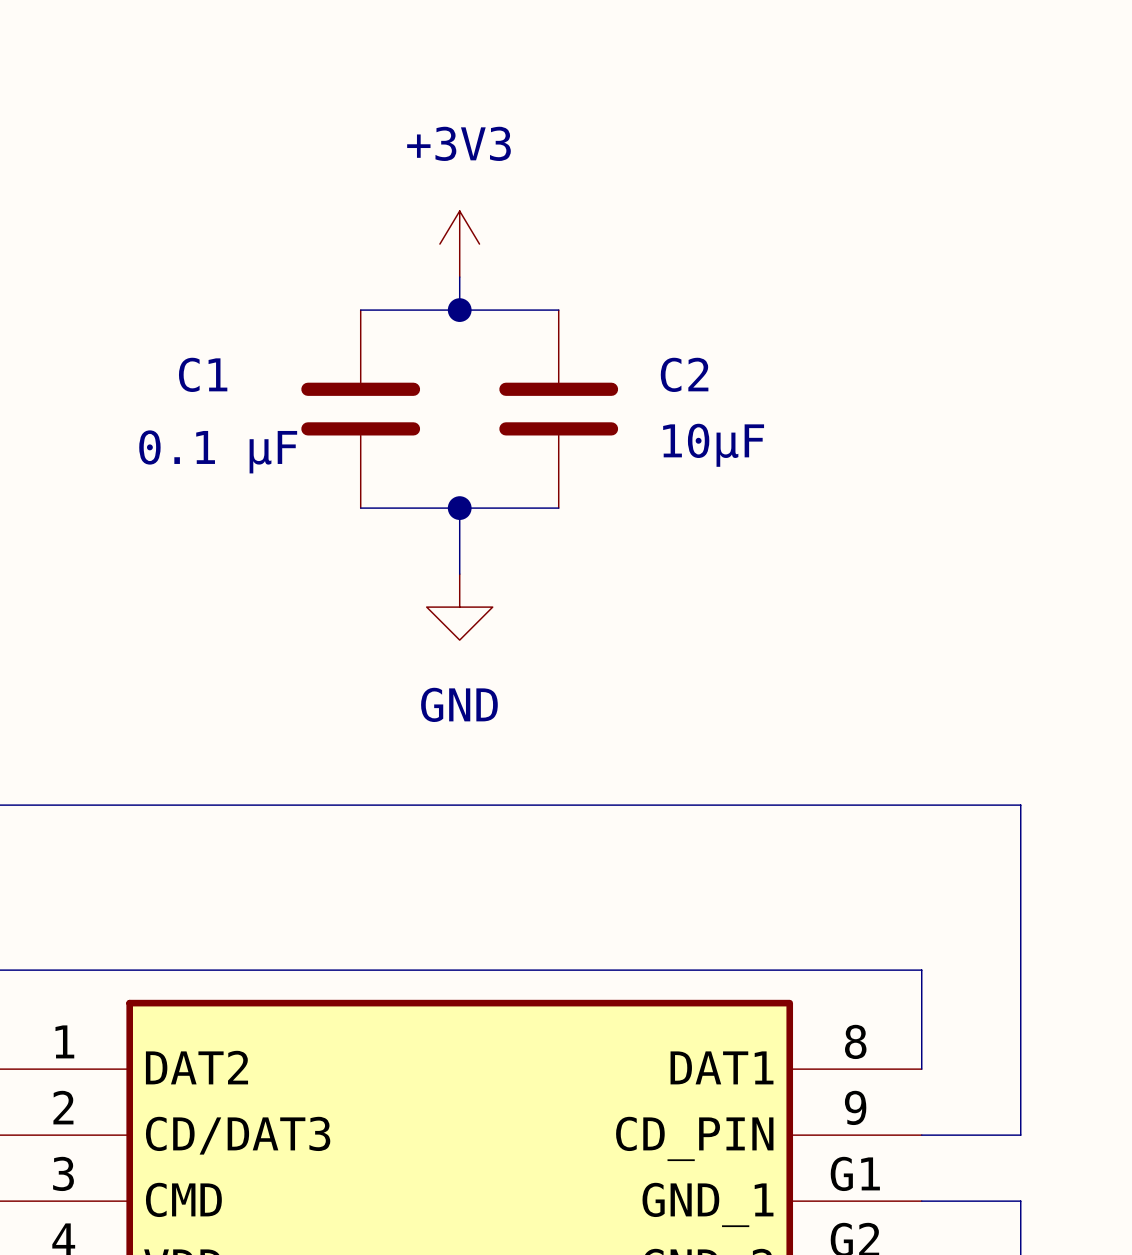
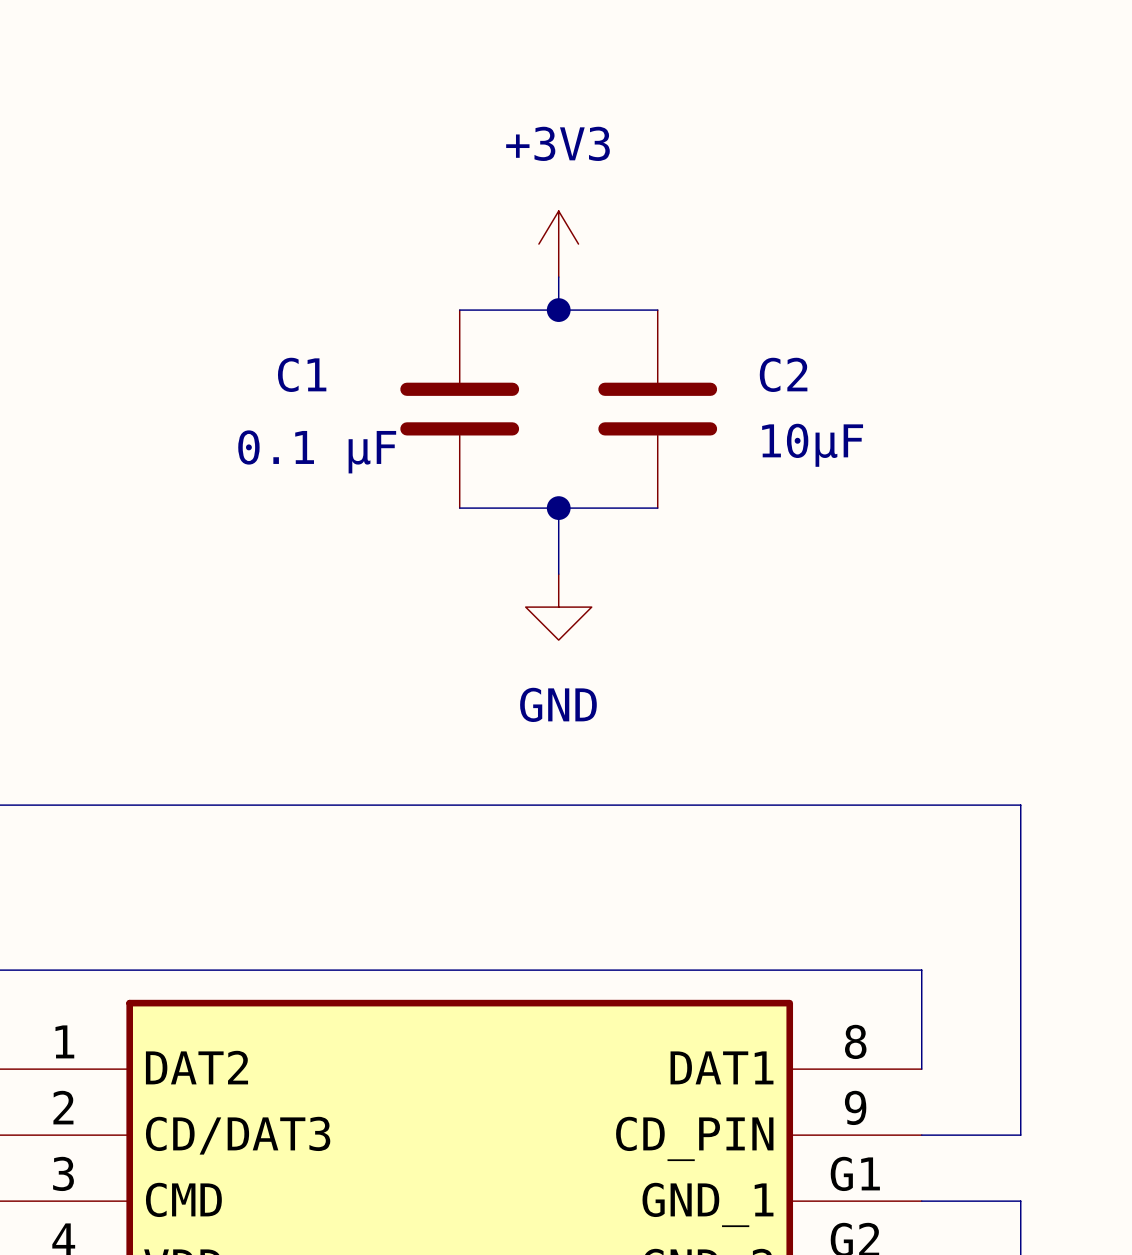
power symbol position: +3V3 (459, 244) -> +3V3 (558, 244)
wire: (459, 277) (459, 310) (360, 310) -> none
wire: none -> (558, 277) (558, 310) (657, 310)
junction position: (459, 310) -> (558, 310)
C1 position: (360, 409) -> (459, 409)
C2 position: (558, 409) -> (657, 409)
wire: (360, 508) (459, 508) (459, 574) -> none
junction position: (459, 508) -> (558, 508)
wire: none -> (657, 508) (558, 508) (558, 574)
power symbol position: GND (459, 607) -> GND (558, 607)

